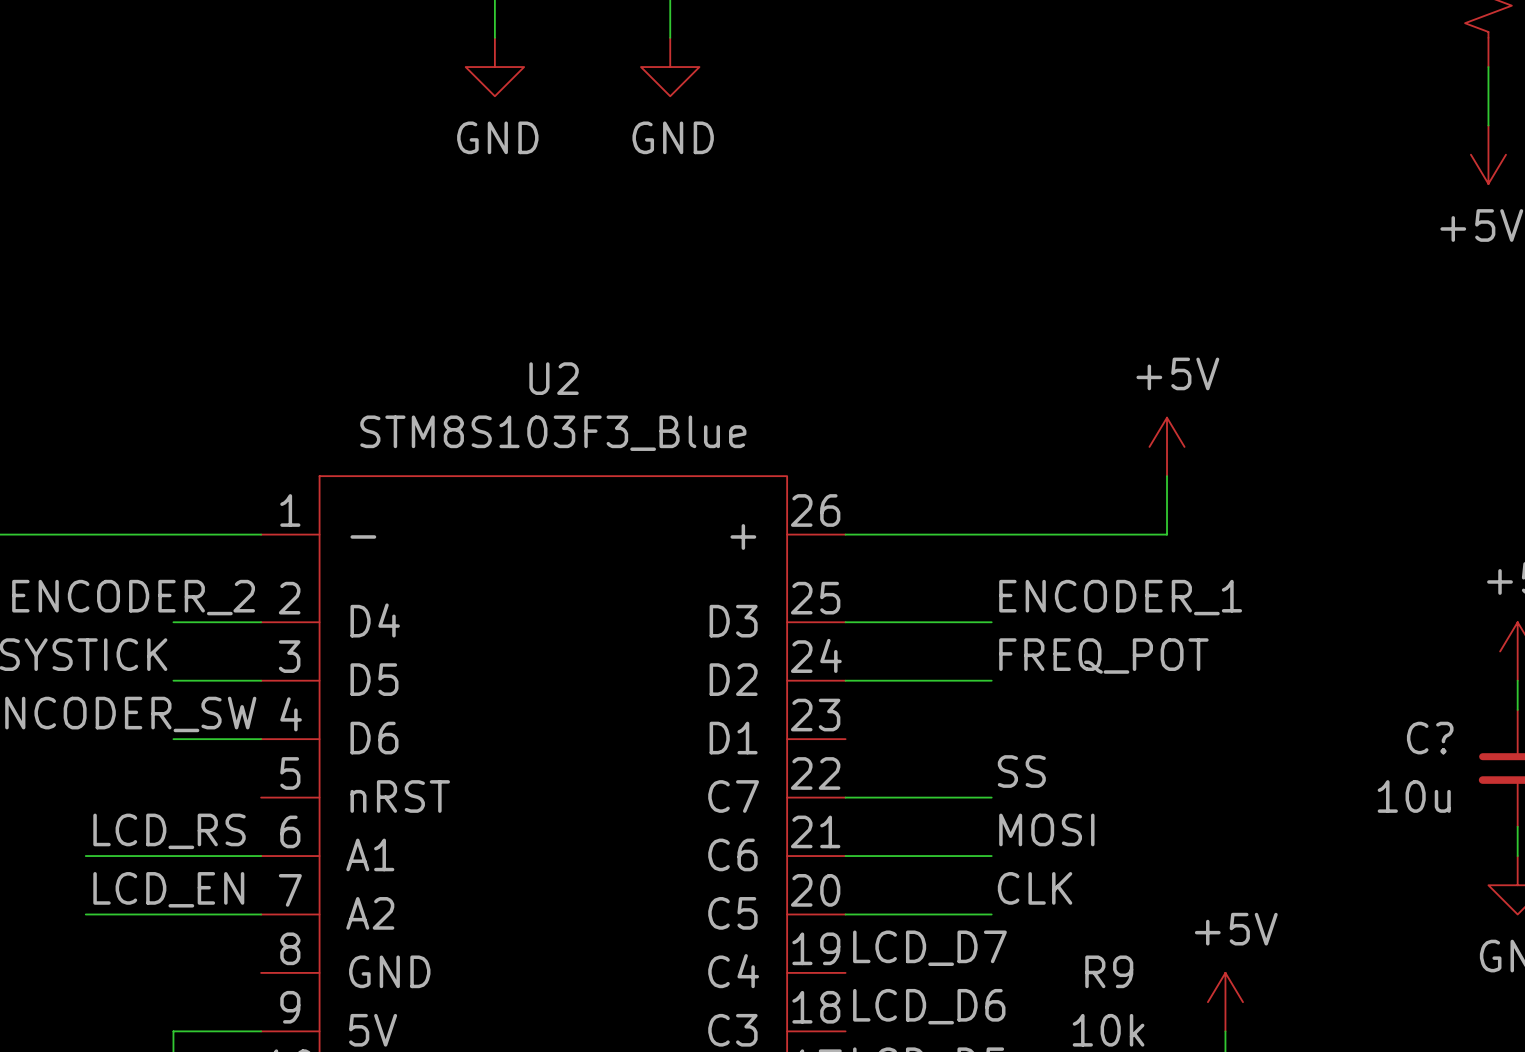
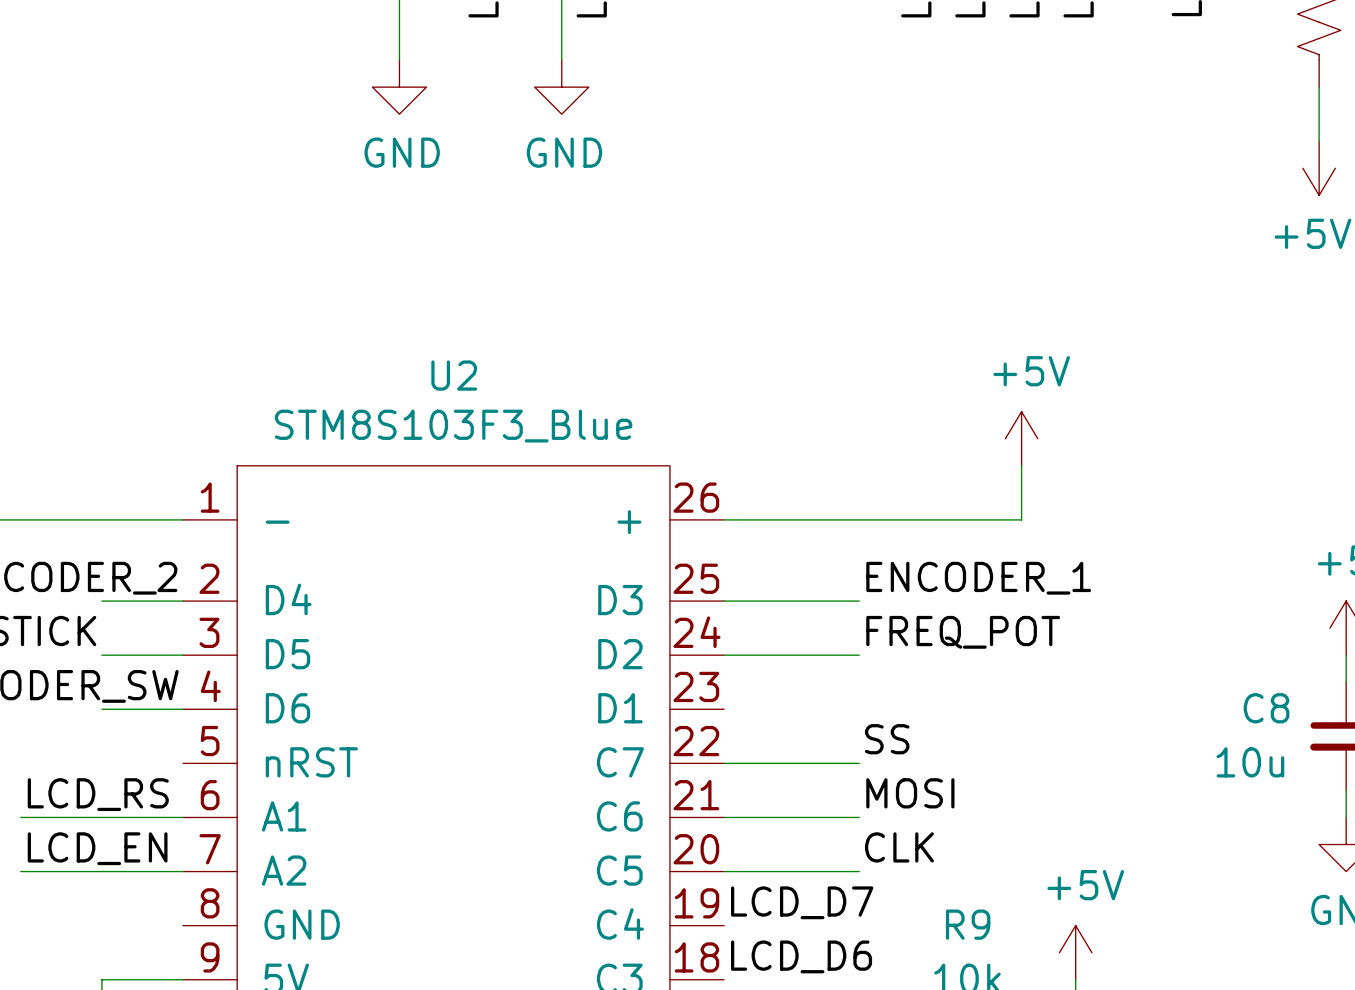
C? name: C? (1430, 738) -> C8 (1266, 708)

